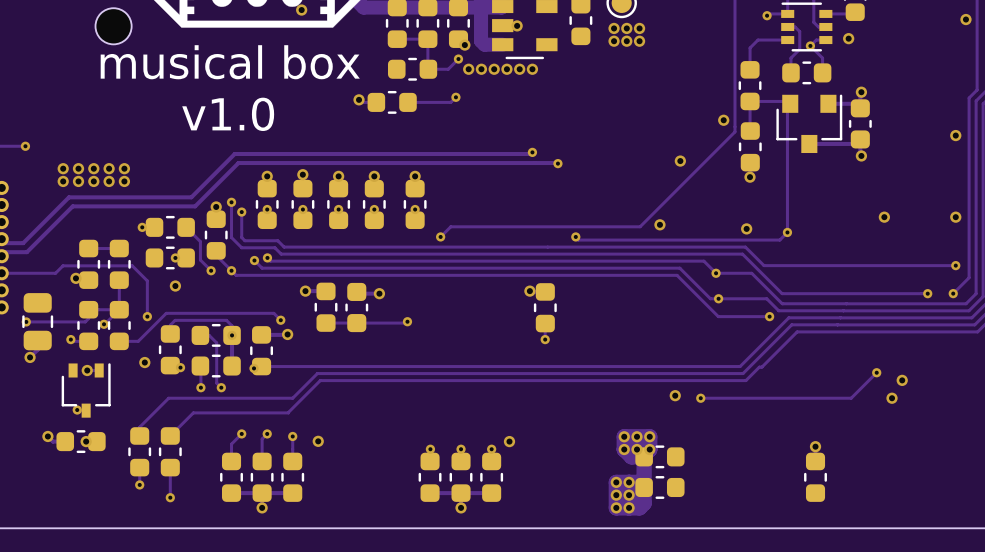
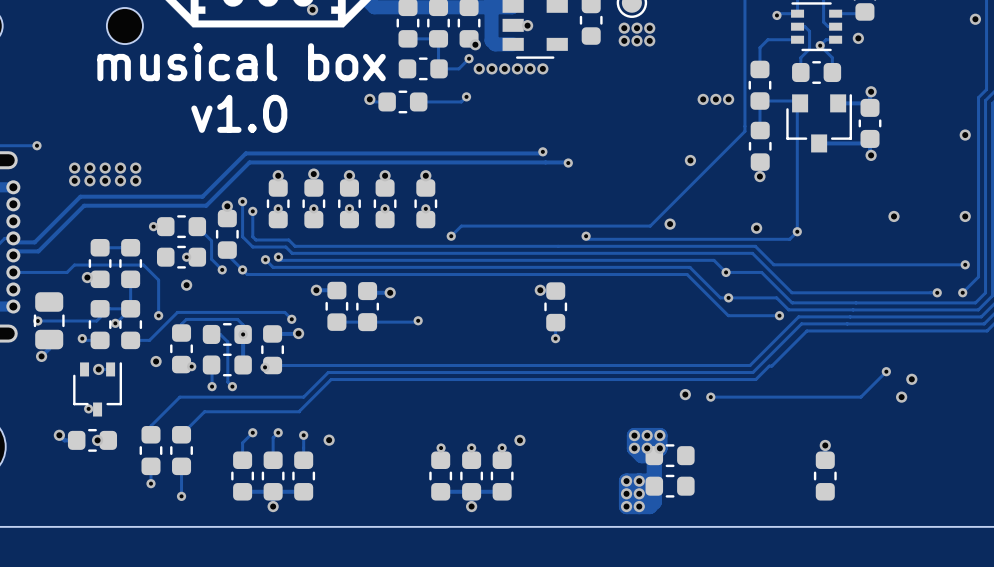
via: none -> (703, 99)
via: none -> (715, 99)
via: none -> (728, 99)
via: (723, 120) -> none

